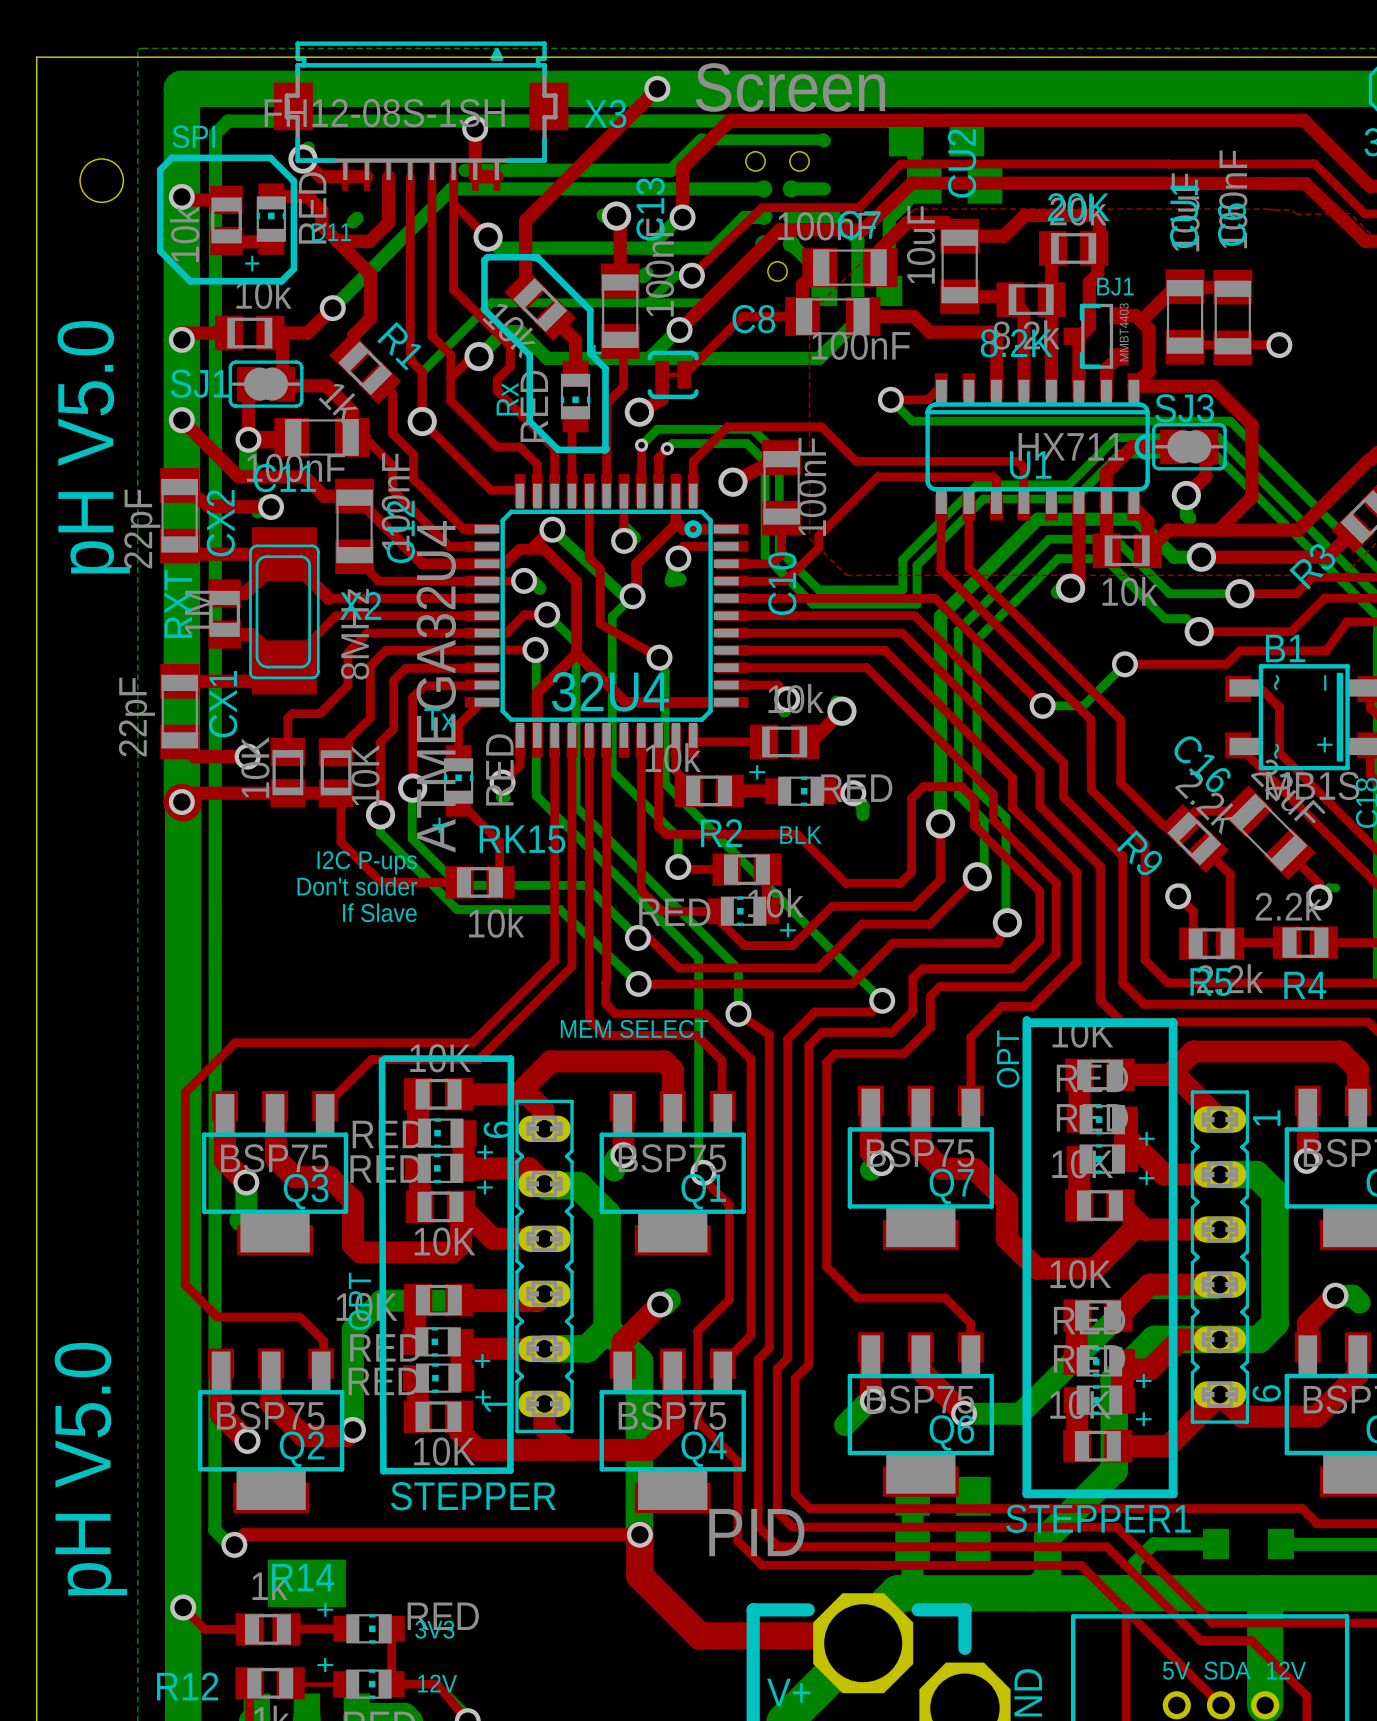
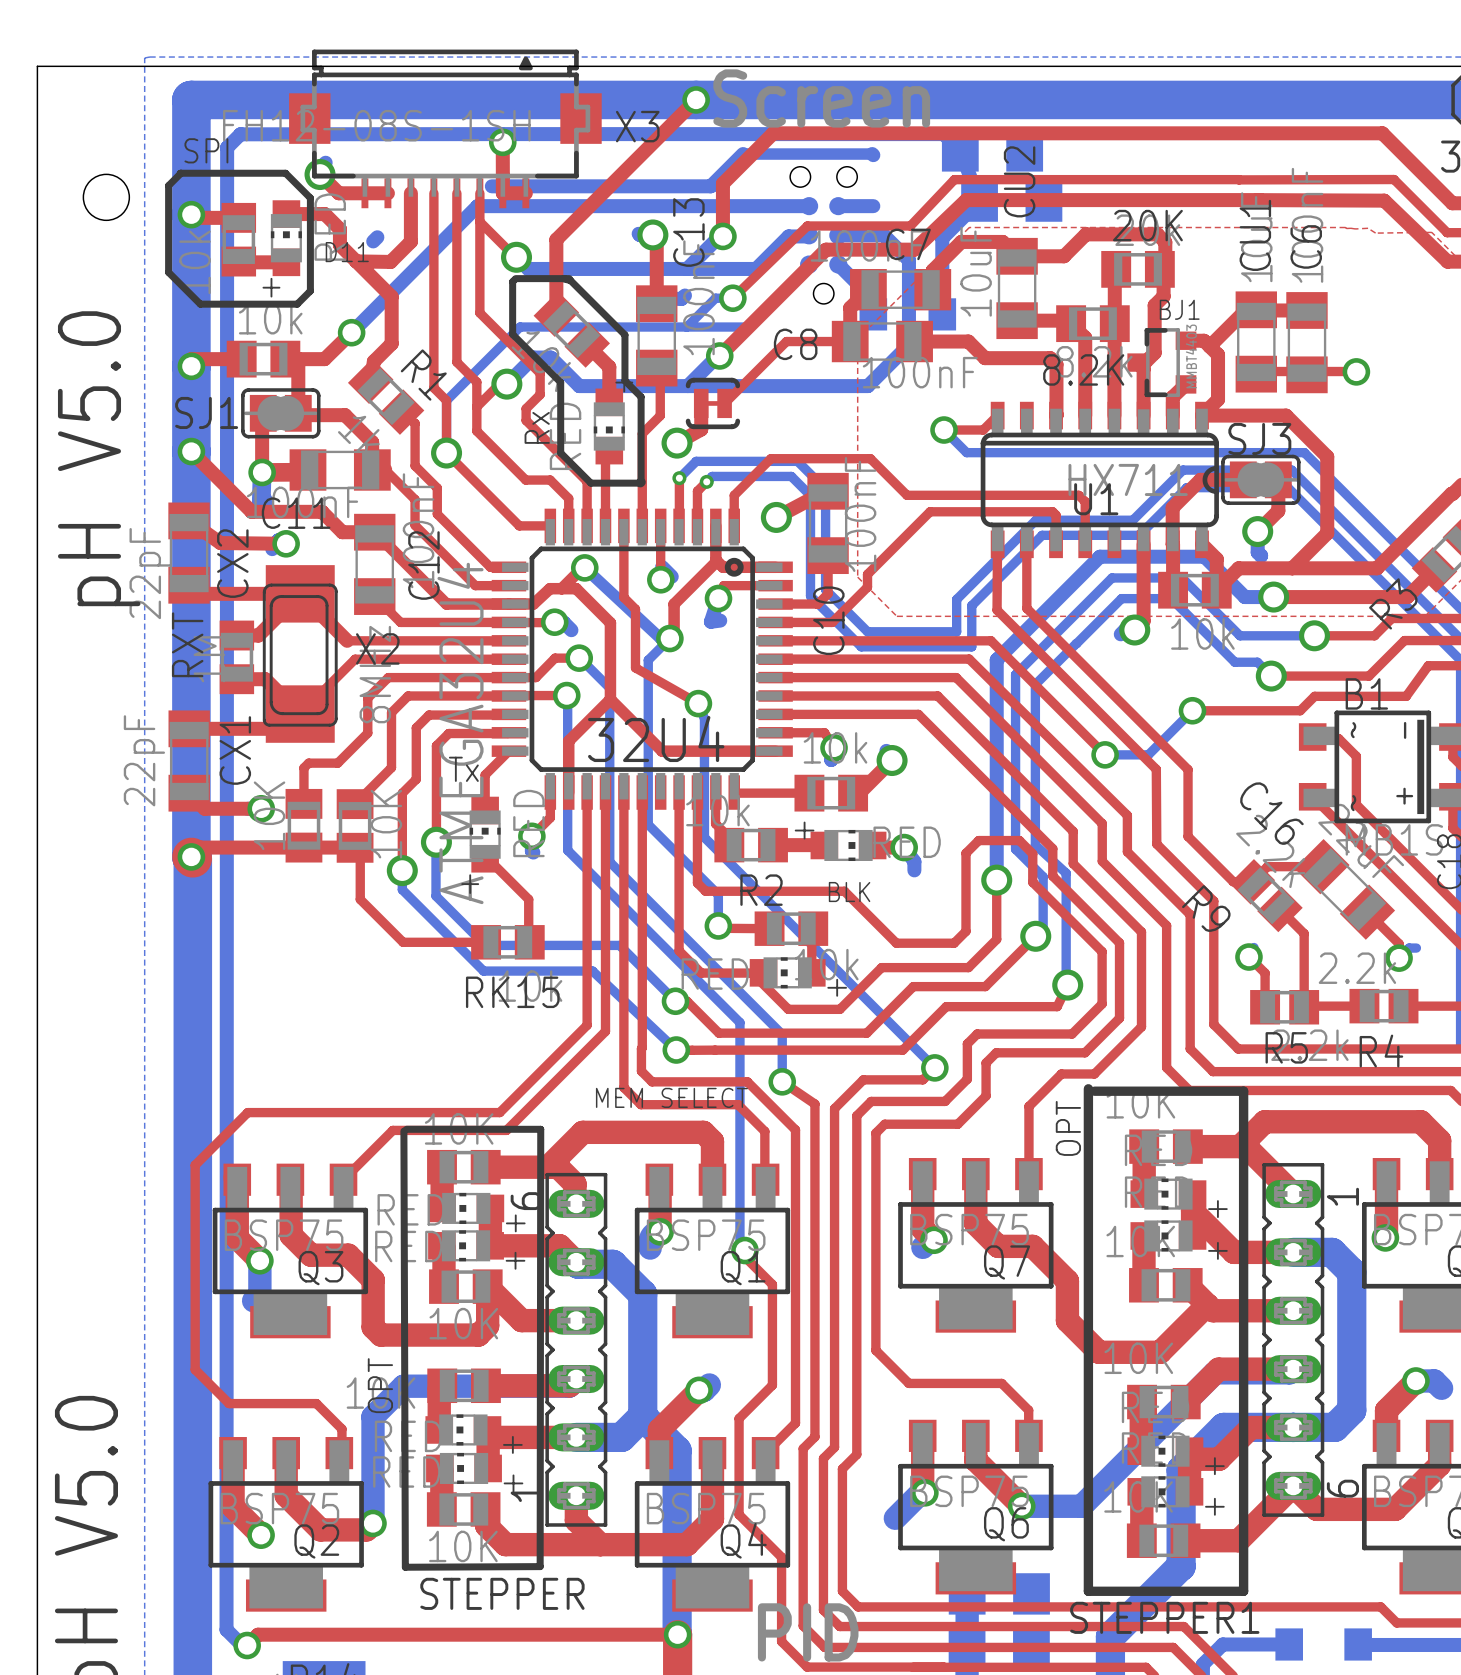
RK15 name position: RK15 (522, 839) -> RK15 (512, 992)
text: I2C P-ups (367, 862) -> none
text: Don't solder (357, 886) -> none
text: If Slave (379, 912) -> none

